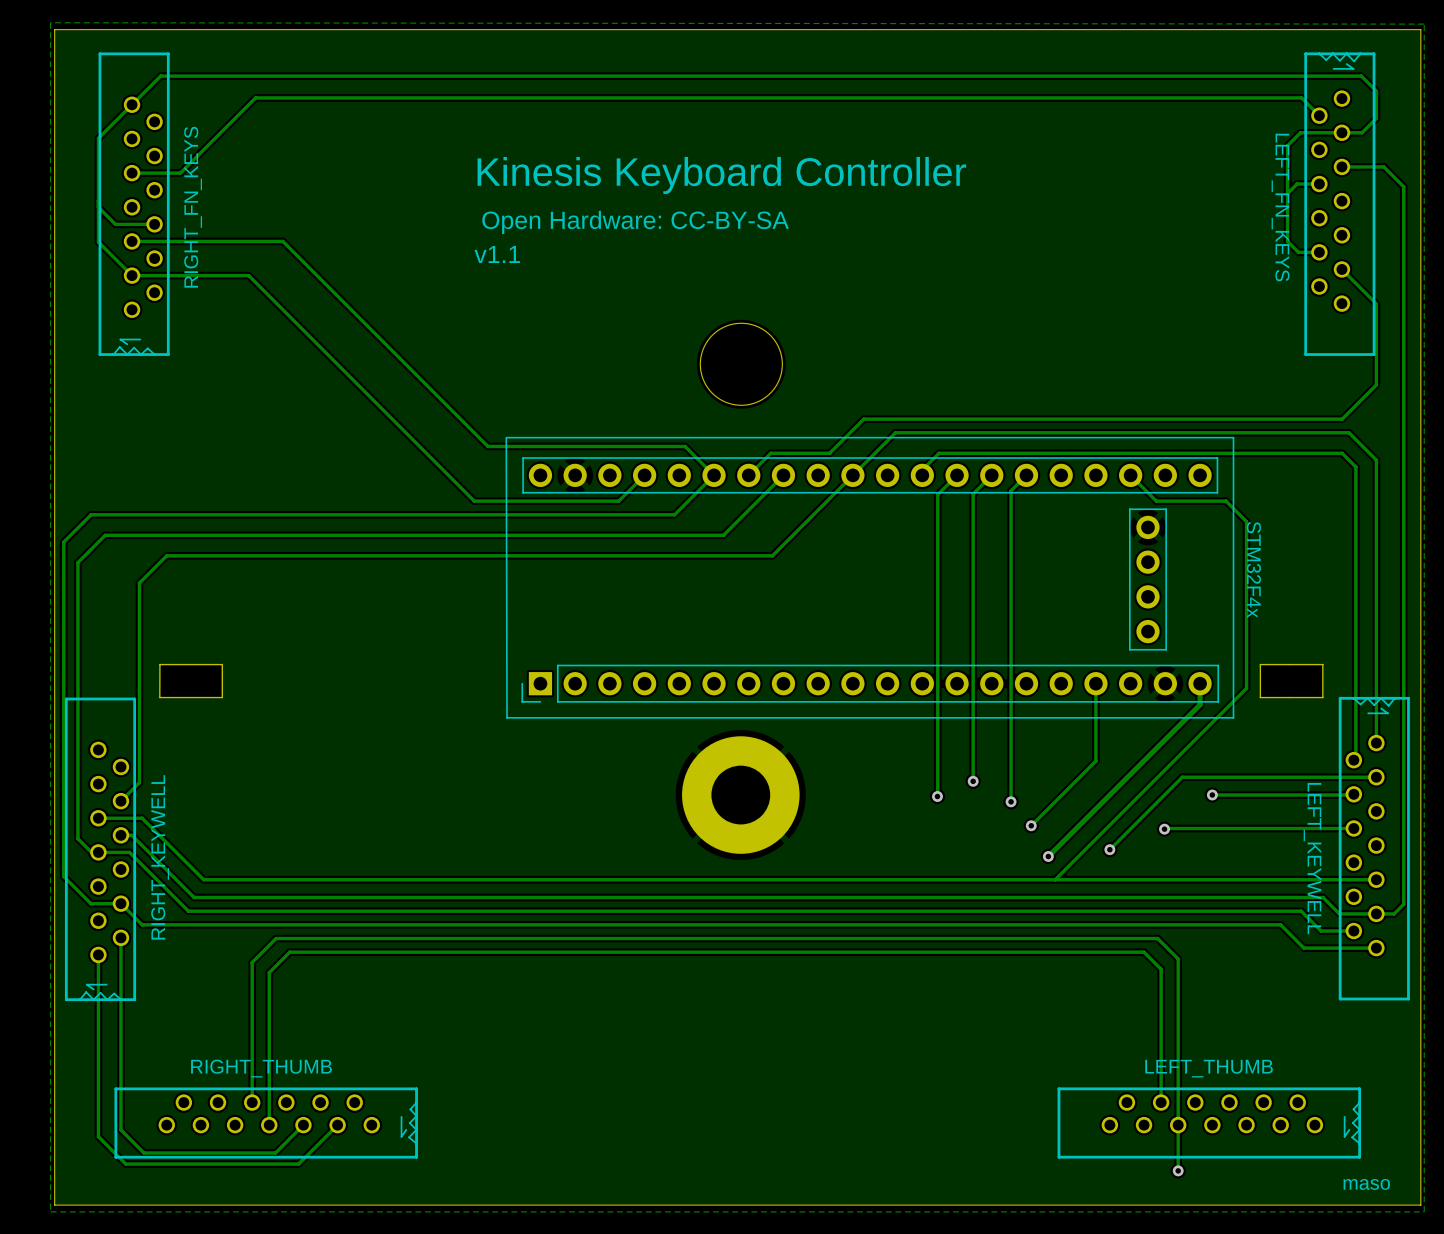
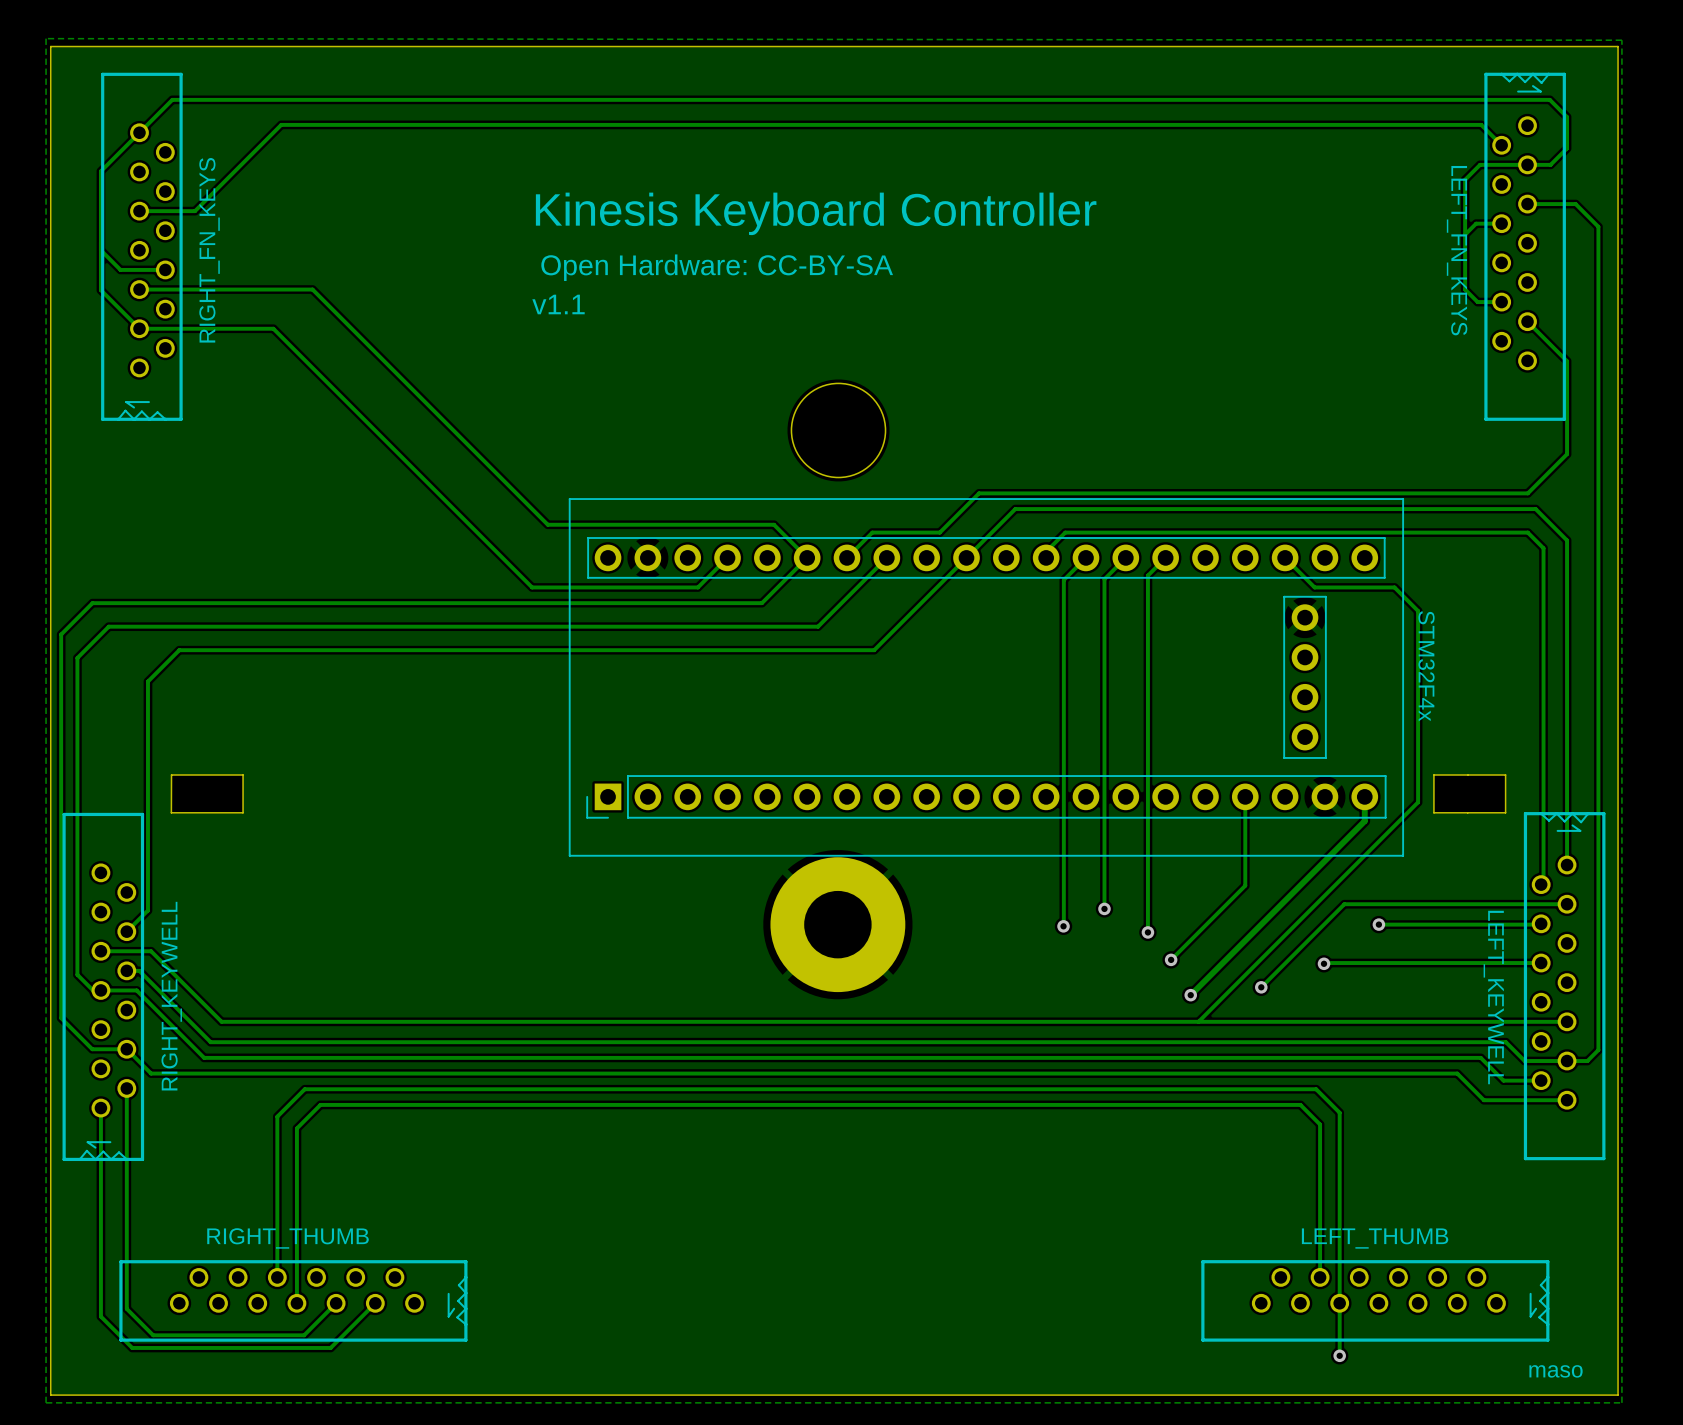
part footprint: [505, 436, 1235, 719] -> [568, 498, 1405, 857]

